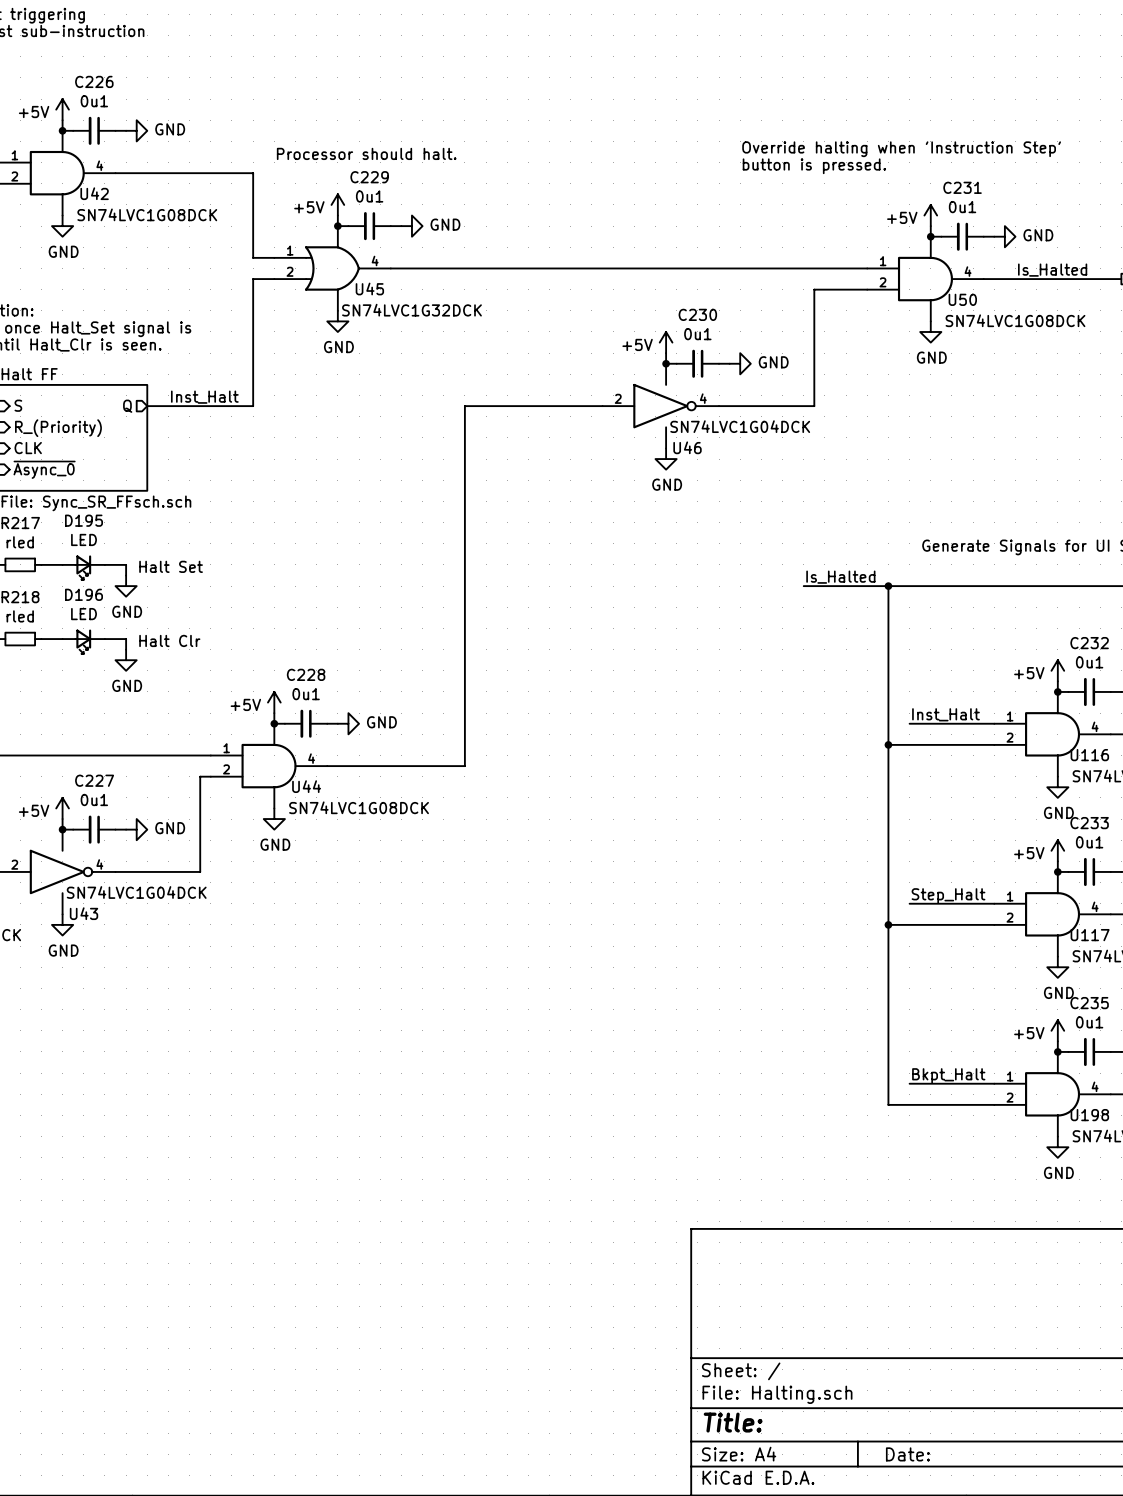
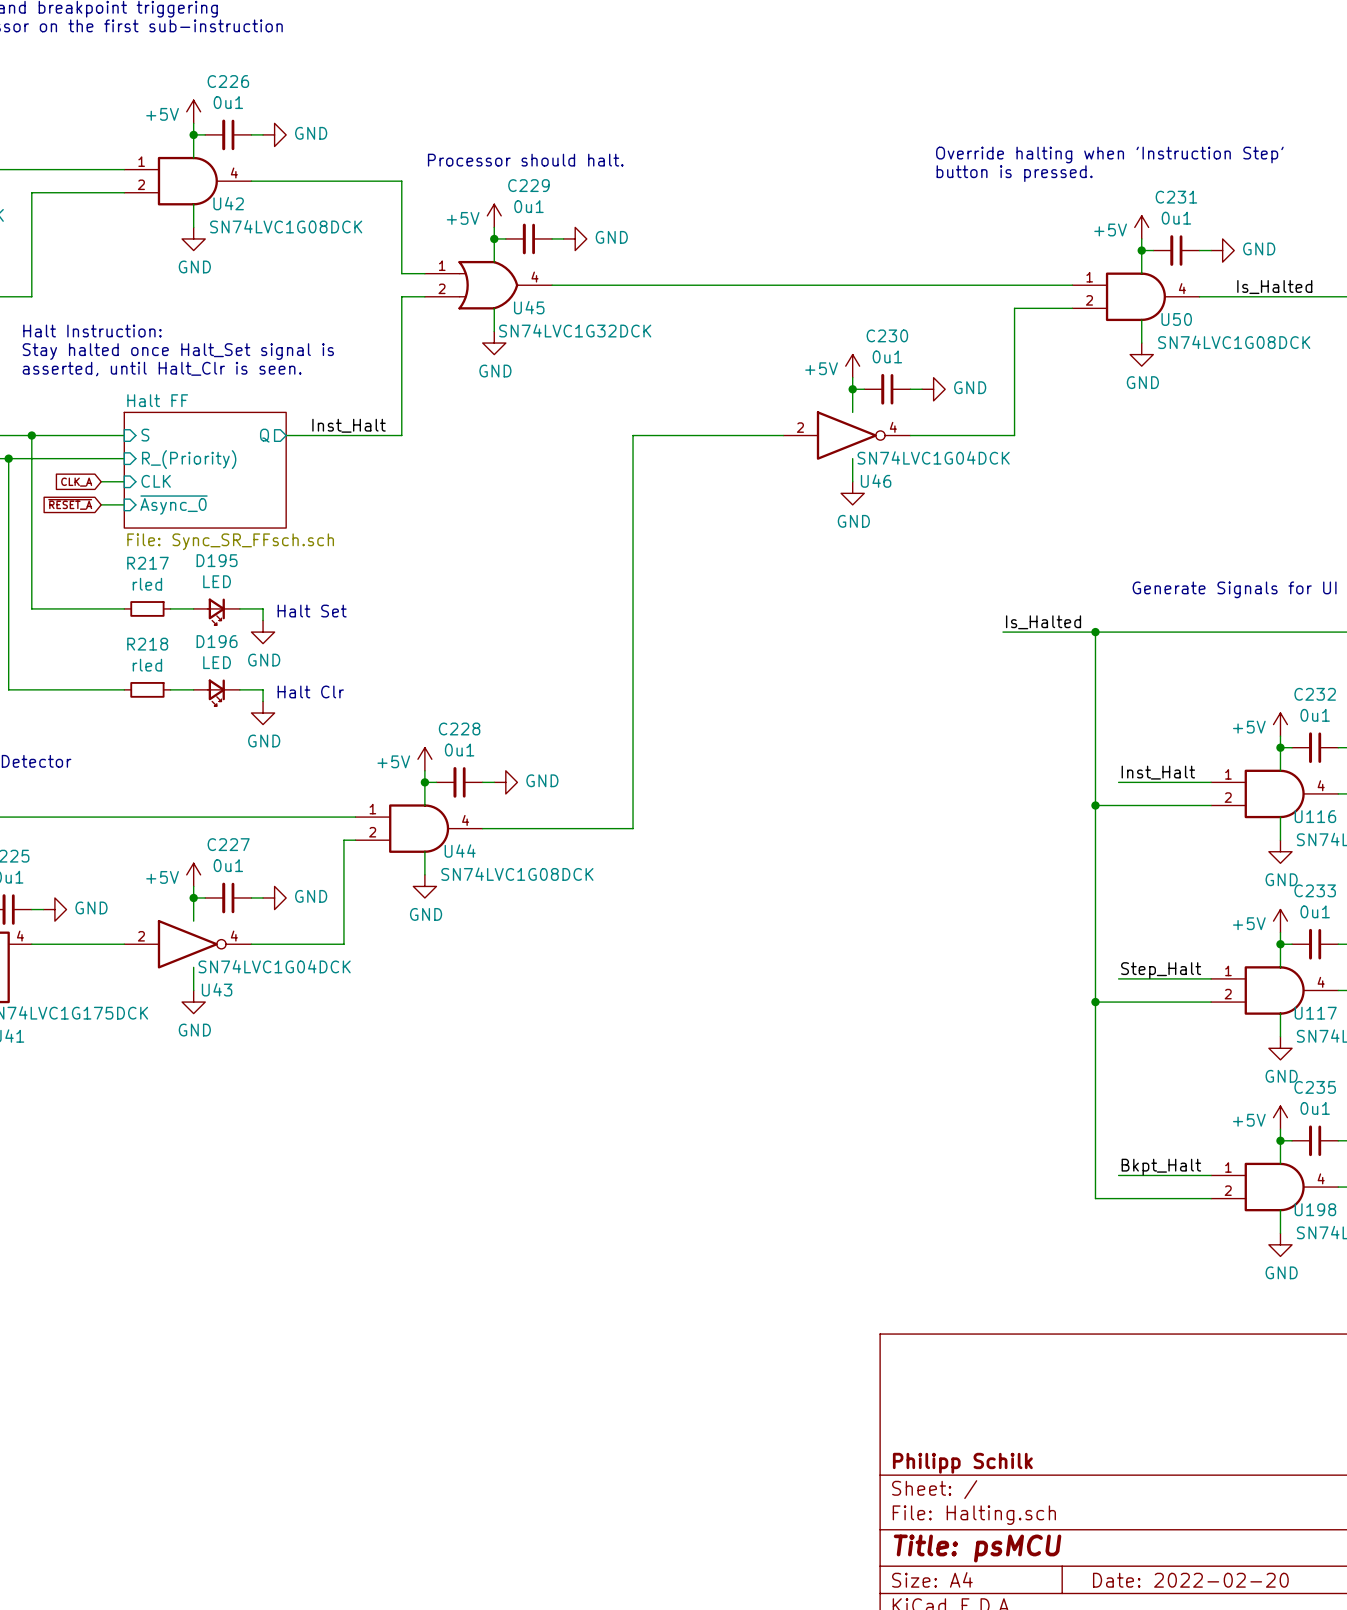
title block: none -> Philipp Schilk (962, 1463)
title block: Title: (733, 1422) -> Title: psMCU (977, 1548)
title block: Date: (907, 1454) -> Date: 2022-02-20 (1190, 1580)

